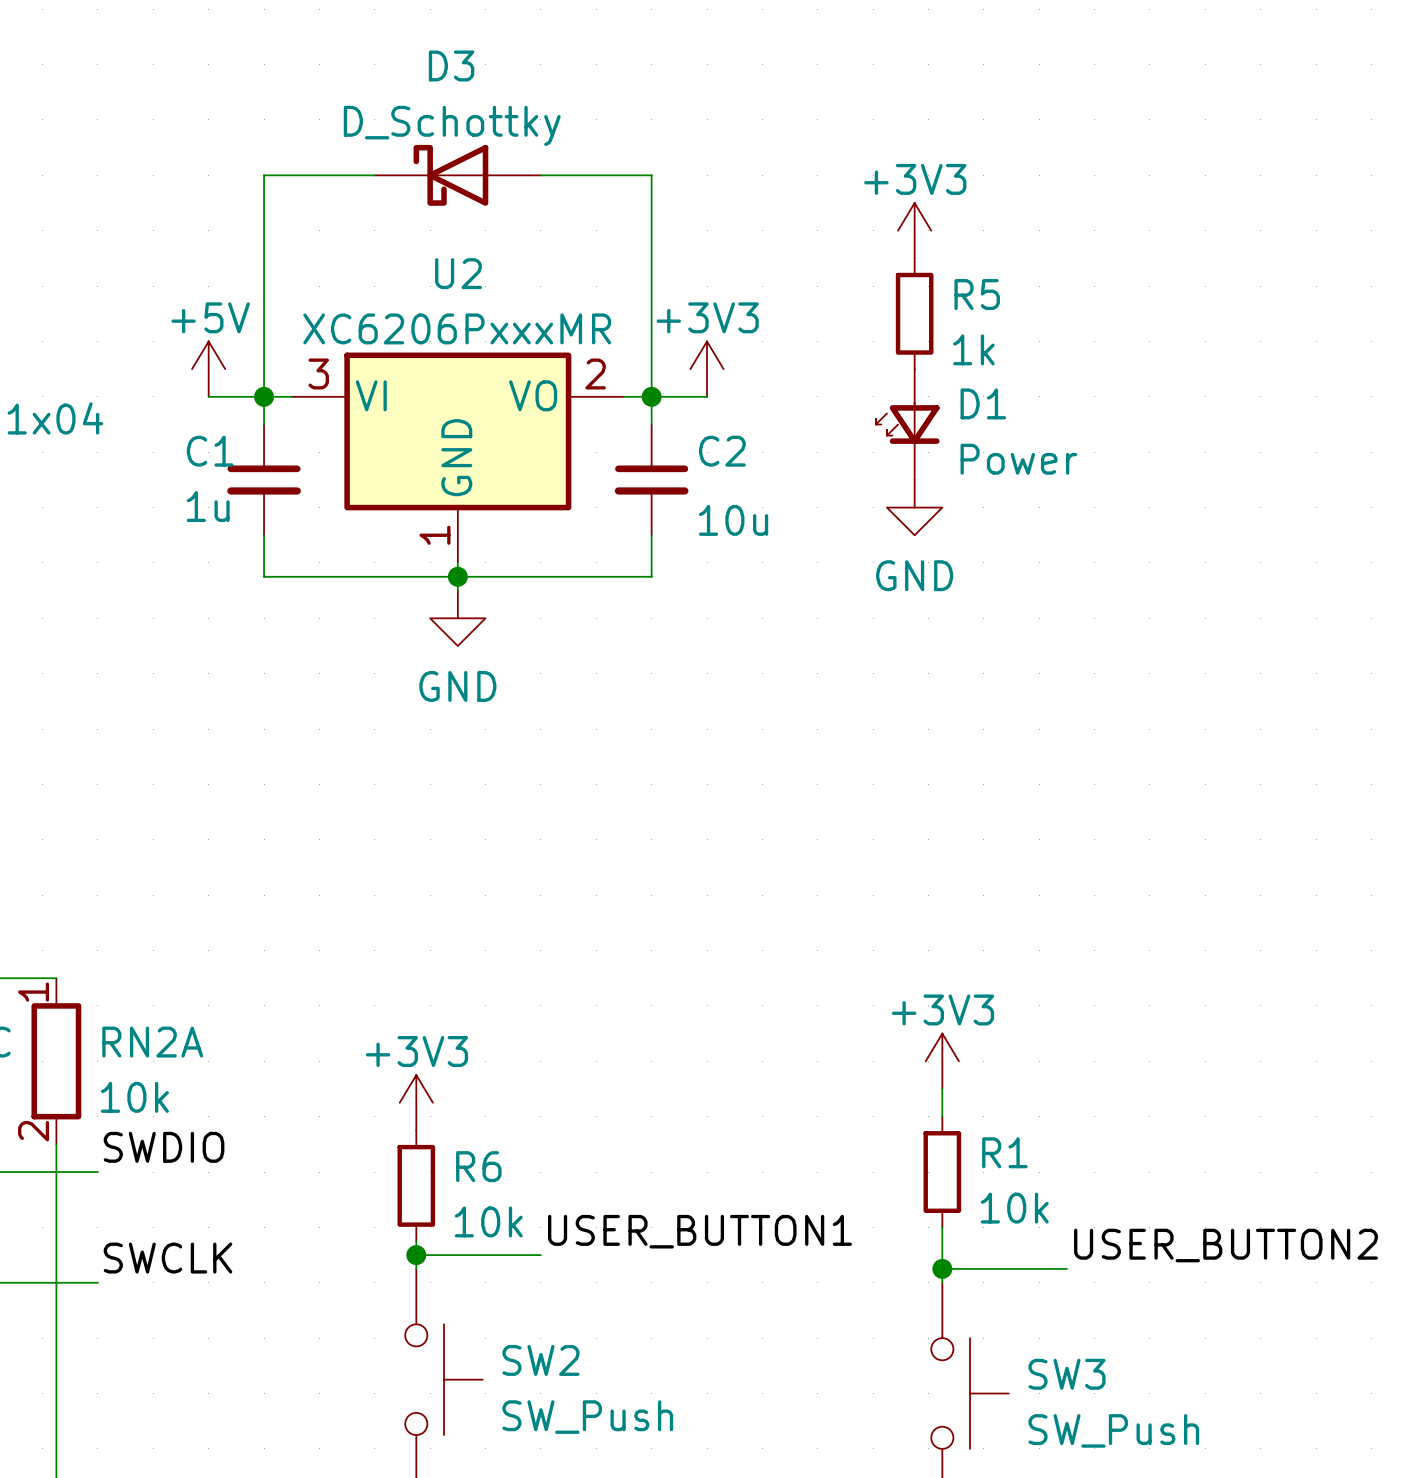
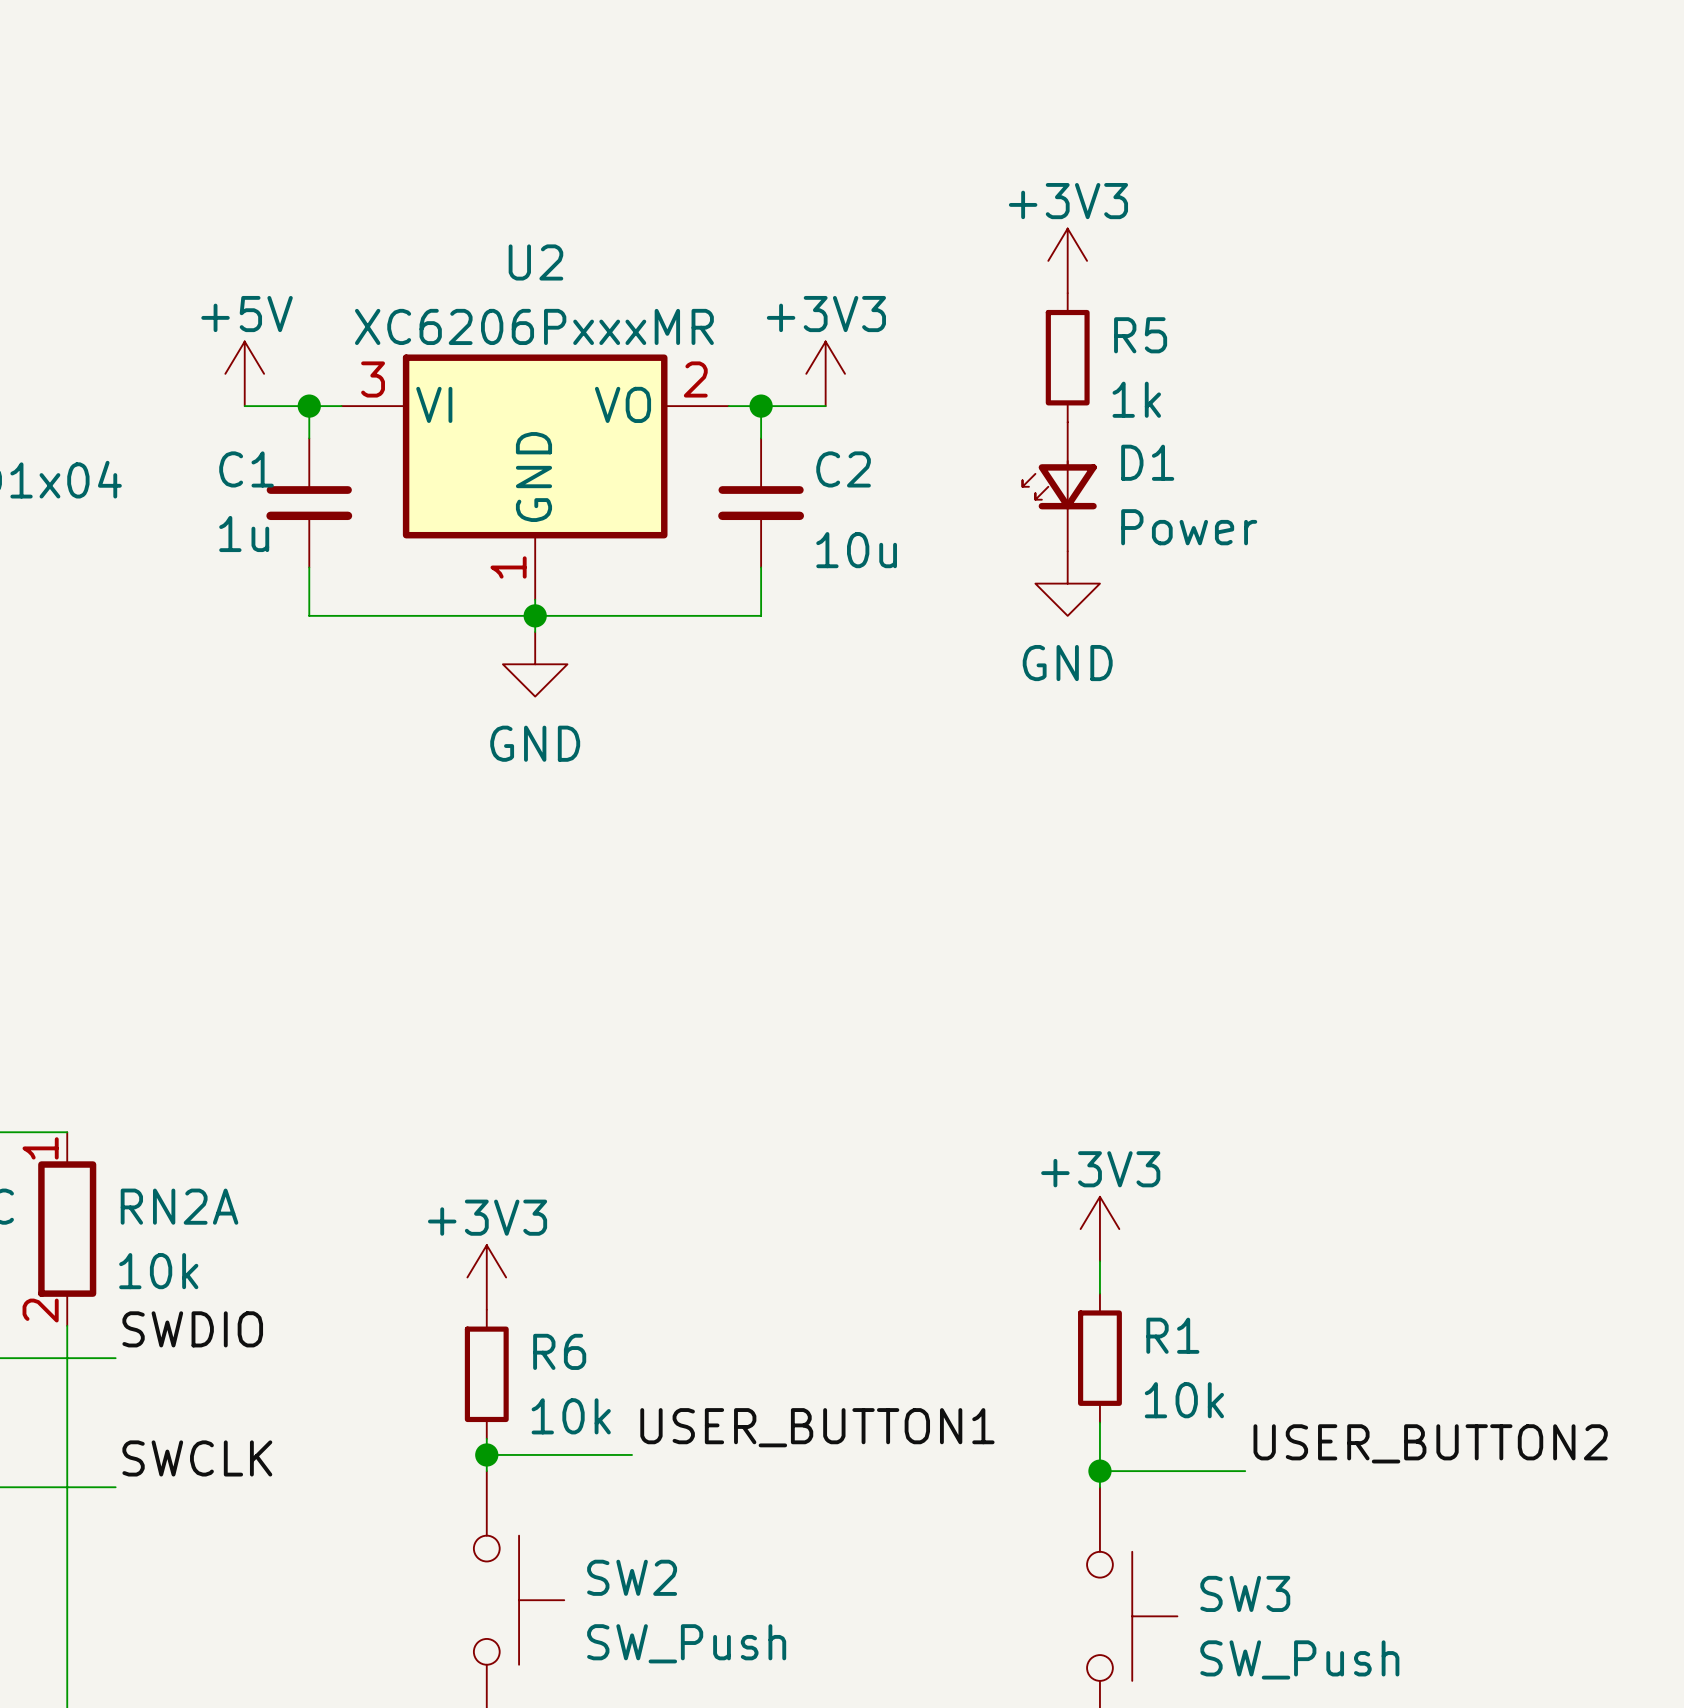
wire: (374, 175) (264, 175) (264, 355) -> none
D3: D_Schottky (457, 175) -> none
wire: (540, 175) (651, 175) (651, 355) -> none
power symbol position: +5V (208, 369) -> +5V (244, 373)
power symbol position: +3V3 (707, 369) -> +3V3 (825, 373)
wire: (208, 396) (291, 396) -> (244, 406) (341, 406)
junction position: (264, 396) -> (309, 406)
wire: (623, 396) (707, 396) -> (728, 406) (825, 406)
junction position: (651, 396) -> (761, 406)
U2 position: (457, 457) -> (535, 477)
C1 position: (264, 479) -> (309, 502)
C2 position: (651, 479) -> (761, 502)
wire: (264, 535) (264, 576) (651, 576) (651, 535) -> (309, 567) (309, 615) (761, 615) (761, 567)
junction position: (457, 576) -> (535, 615)
power symbol position: GND (457, 618) -> GND (535, 664)

